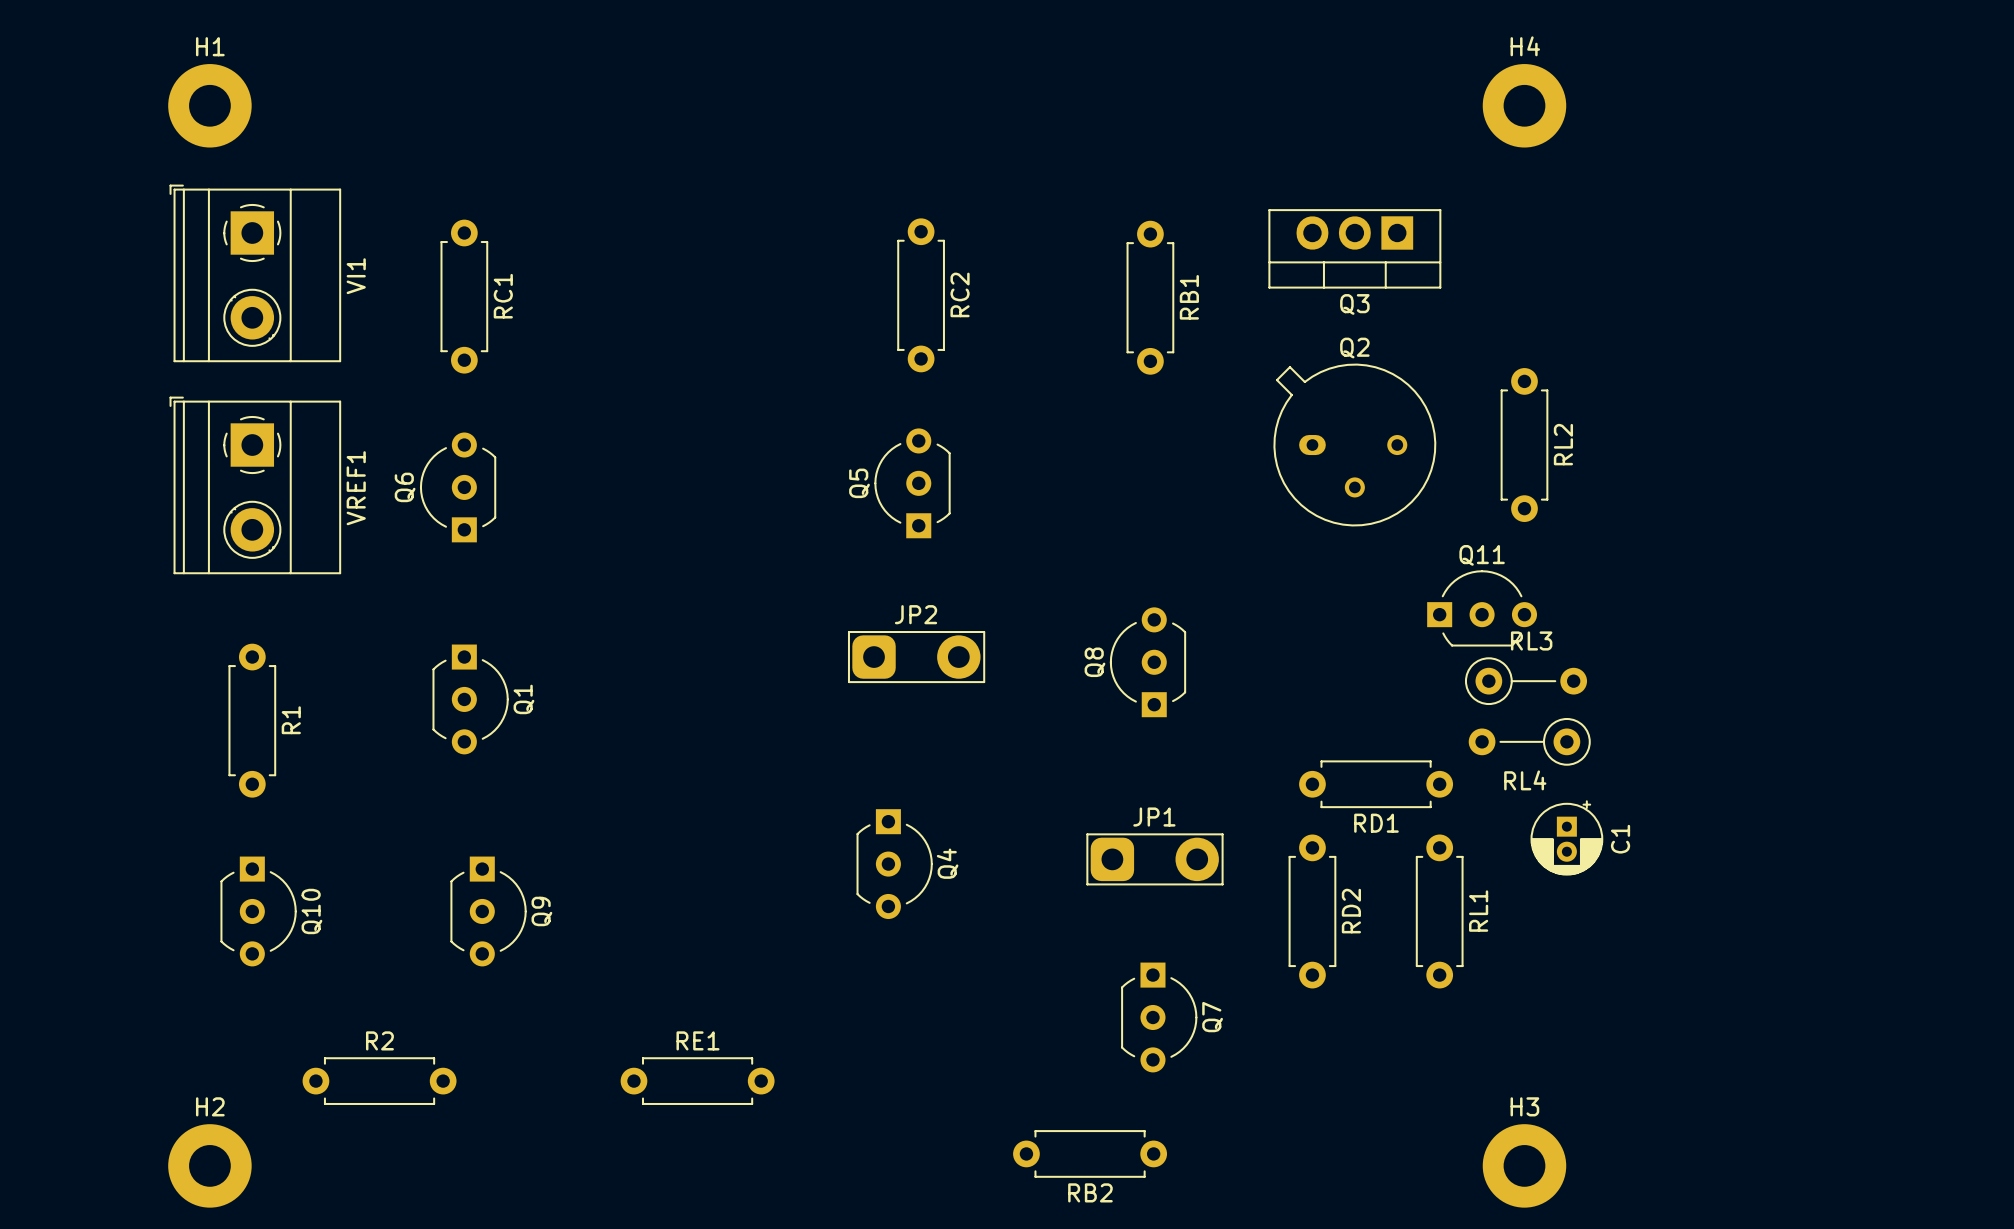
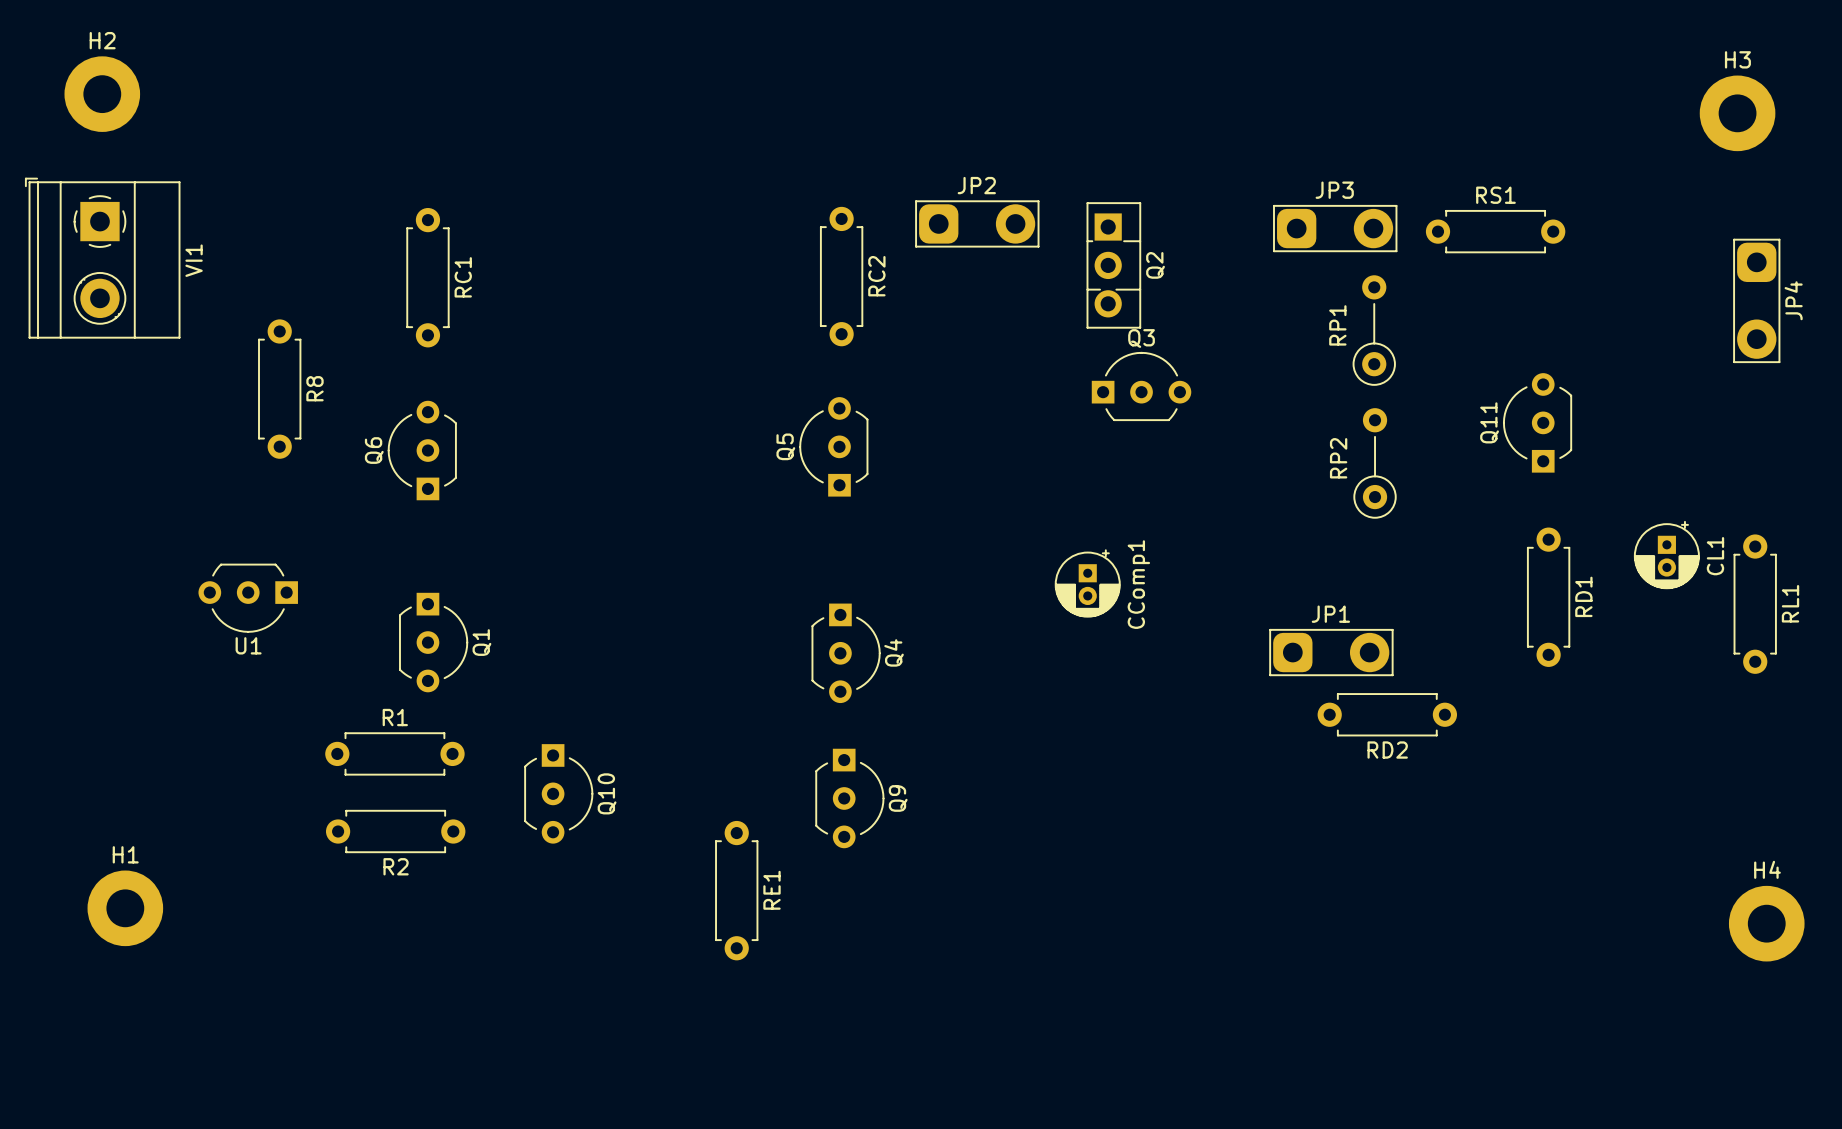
H1 position: (209, 105) -> (125, 908)
H4 position: (1524, 105) -> (1766, 923)
Q3 footprint: [1268, 209, 1442, 289] -> [1091, 351, 1192, 422]
JP3: none -> (1335, 228)
RS1: none -> (1495, 231)
VI1 position: (255, 273) -> (102, 258)
RB1: (1150, 297) -> none
Q3 name position: Q3 (1354, 304) -> Q3 (1141, 338)
JP4: none -> (1756, 300)
Q2 name position: Q2 (1354, 348) -> Q2 (1155, 265)
RP1: none -> (1374, 330)
Q2 footprint: [1273, 363, 1437, 527] -> [1086, 202, 1142, 329]
R8: none -> (279, 389)
RL2: (1524, 445) -> none
VREF1: (255, 485) -> none
RP2: none -> (1375, 463)
CL1: none -> (1666, 555)
Q11 rotation: 0° (1482, 608) -> 90° counterclockwise (1537, 422)
Q11 position: (1482, 608) -> (1537, 422)
CComp1: none -> (1087, 583)
U1: none -> (248, 598)
JP2 position: (916, 657) -> (977, 223)
Q8: (1148, 662) -> none
RL3: (1526, 681) -> none
R1 rotation: 0° (252, 720) -> 90° clockwise (394, 753)
R1 position: (252, 720) -> (394, 753)
R1 name position: R1 (291, 720) -> R1 (395, 717)
RL4: (1529, 741) -> none
RD1 rotation: 0° (1376, 784) -> 90° clockwise (1548, 597)
RD1 position: (1376, 784) -> (1548, 597)
RD1 name position: RD1 (1376, 823) -> RD1 (1583, 596)
C1: (1566, 837) -> none
JP1 position: (1154, 859) -> (1331, 652)
Q4 position: (894, 864) -> (846, 653)
Q10 position: (258, 911) -> (558, 793)
Q9 position: (488, 911) -> (849, 798)
RD2 rotation: 0° (1312, 911) -> 90° clockwise (1387, 714)
RD2 position: (1312, 911) -> (1387, 714)
RL1 position: (1439, 911) -> (1755, 604)
Q7: (1159, 1017) -> none
R2 name position: R2 (379, 1040) -> R2 (396, 866)
R2 position: (379, 1081) -> (395, 831)
RE1 rotation: 0° (697, 1081) -> 90° clockwise (736, 890)
RE1 position: (697, 1081) -> (736, 890)
RB2: (1090, 1153) -> none
H2 position: (209, 1165) -> (102, 94)
H3 position: (1524, 1165) -> (1737, 113)

